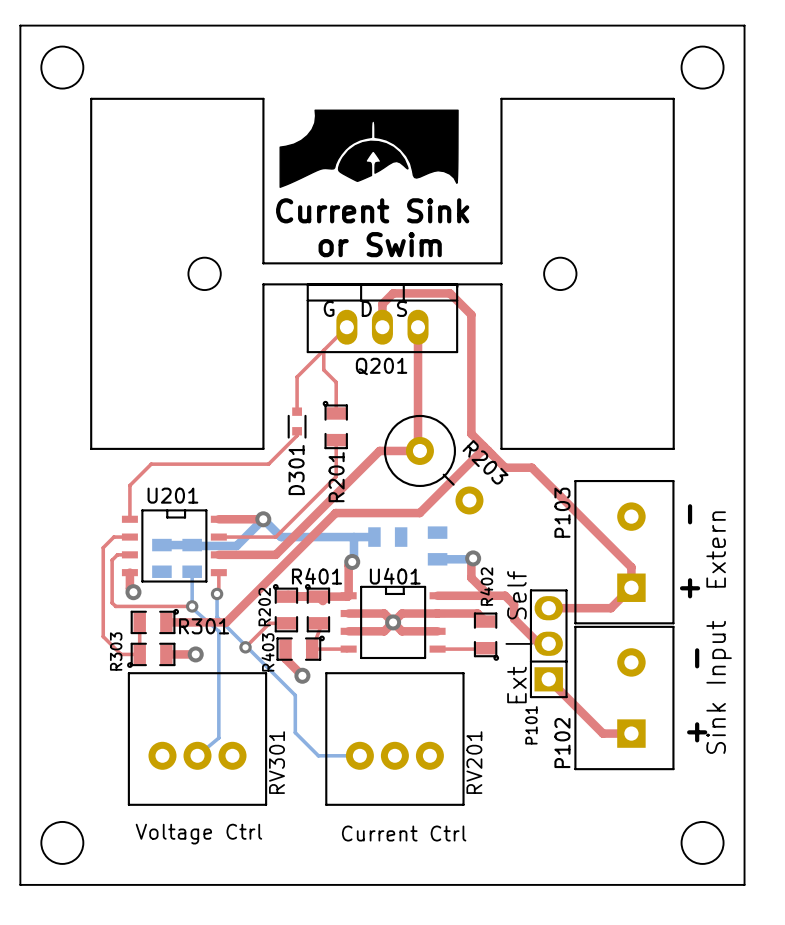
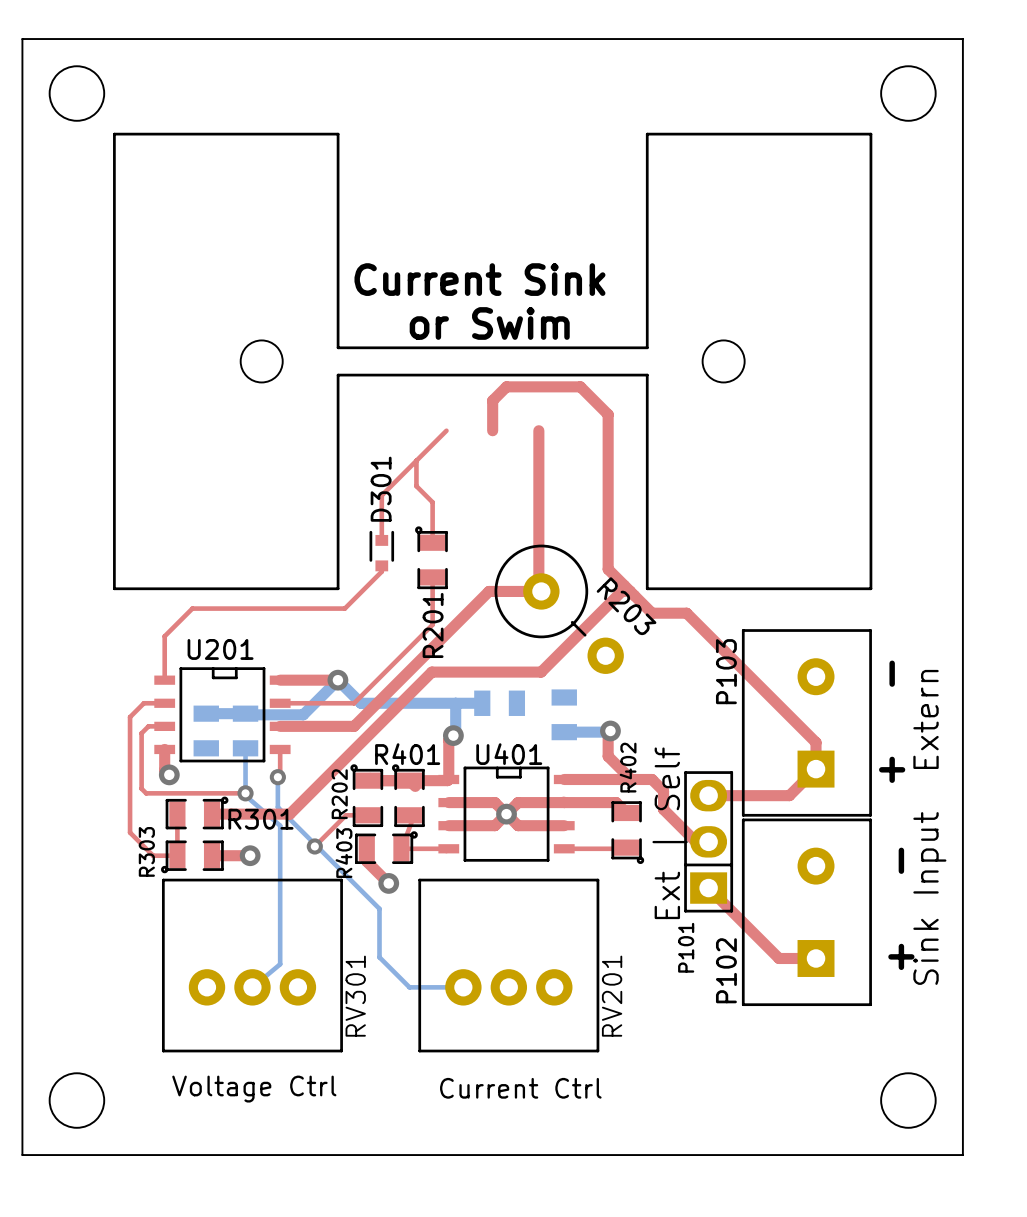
drawing: [279, 109, 459, 289] -> none
Q201: (382, 318) -> none
D301 rotation: 0° (297, 423) -> 180° (381, 551)

